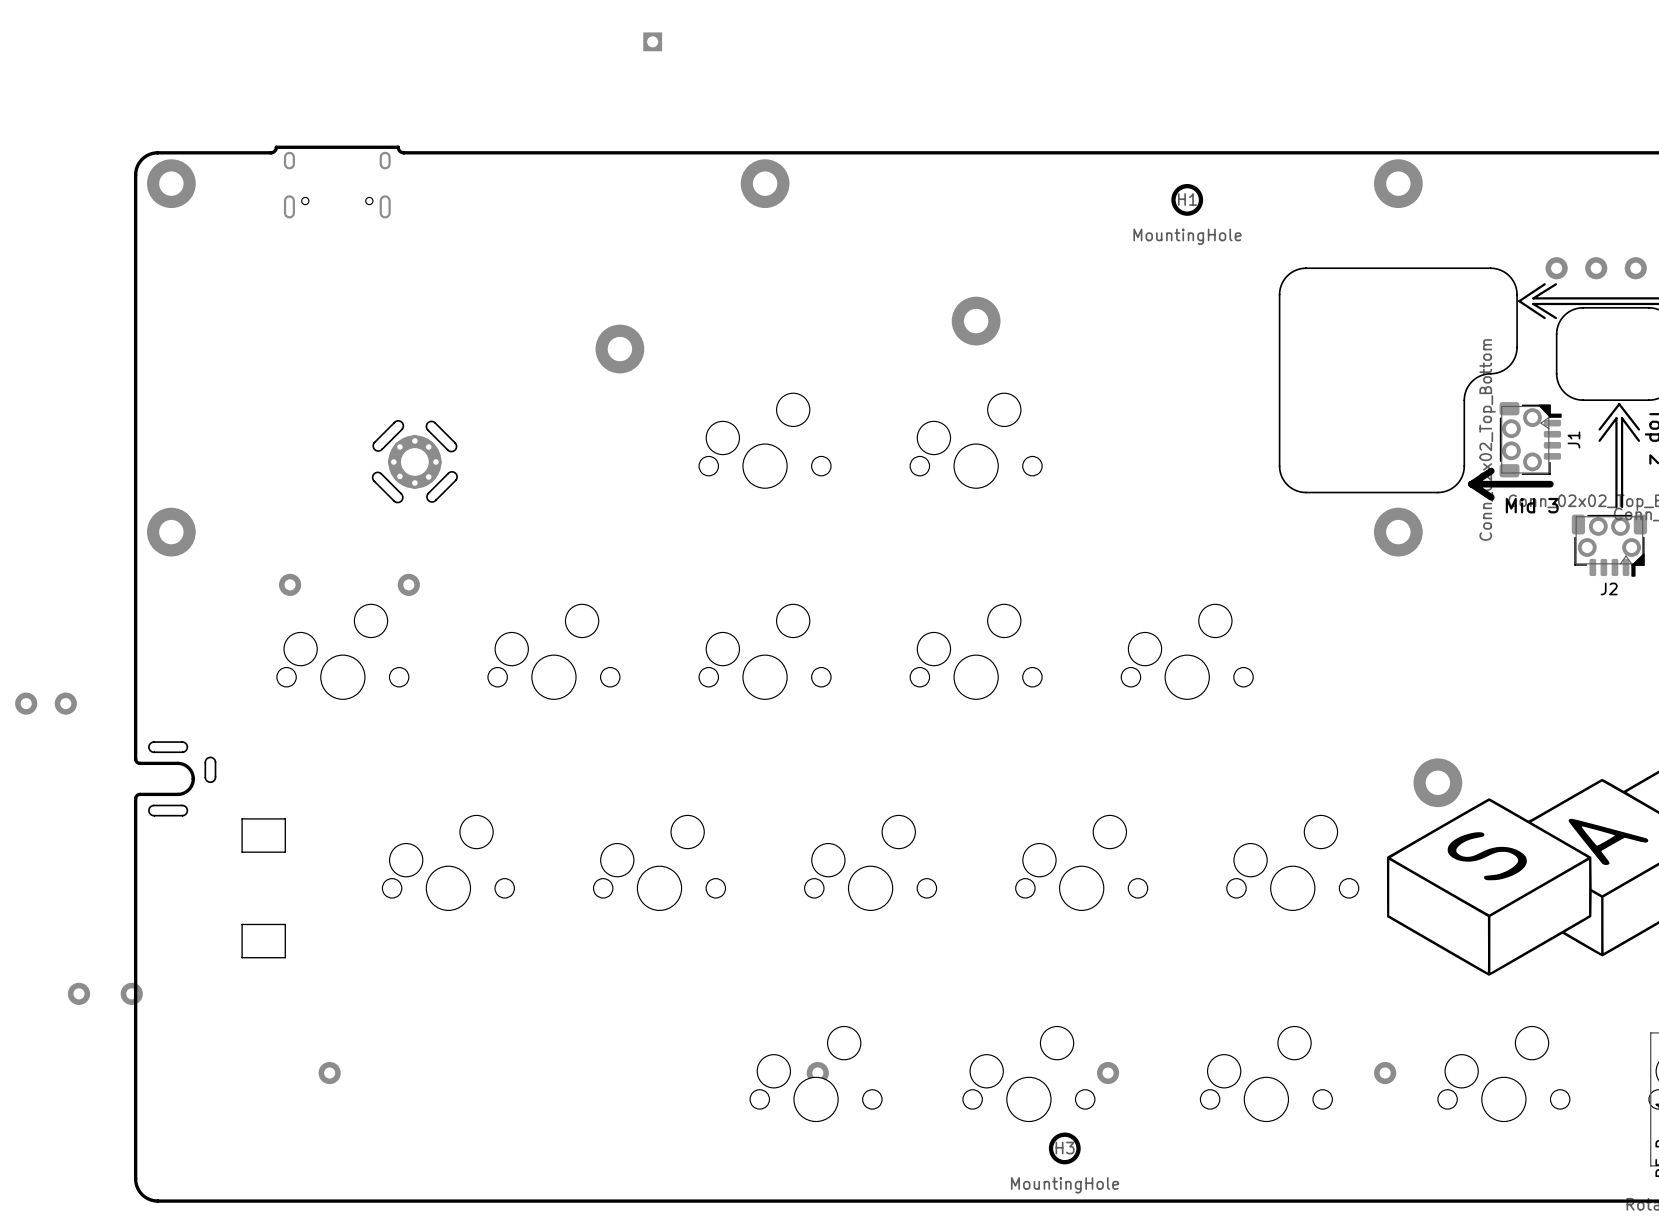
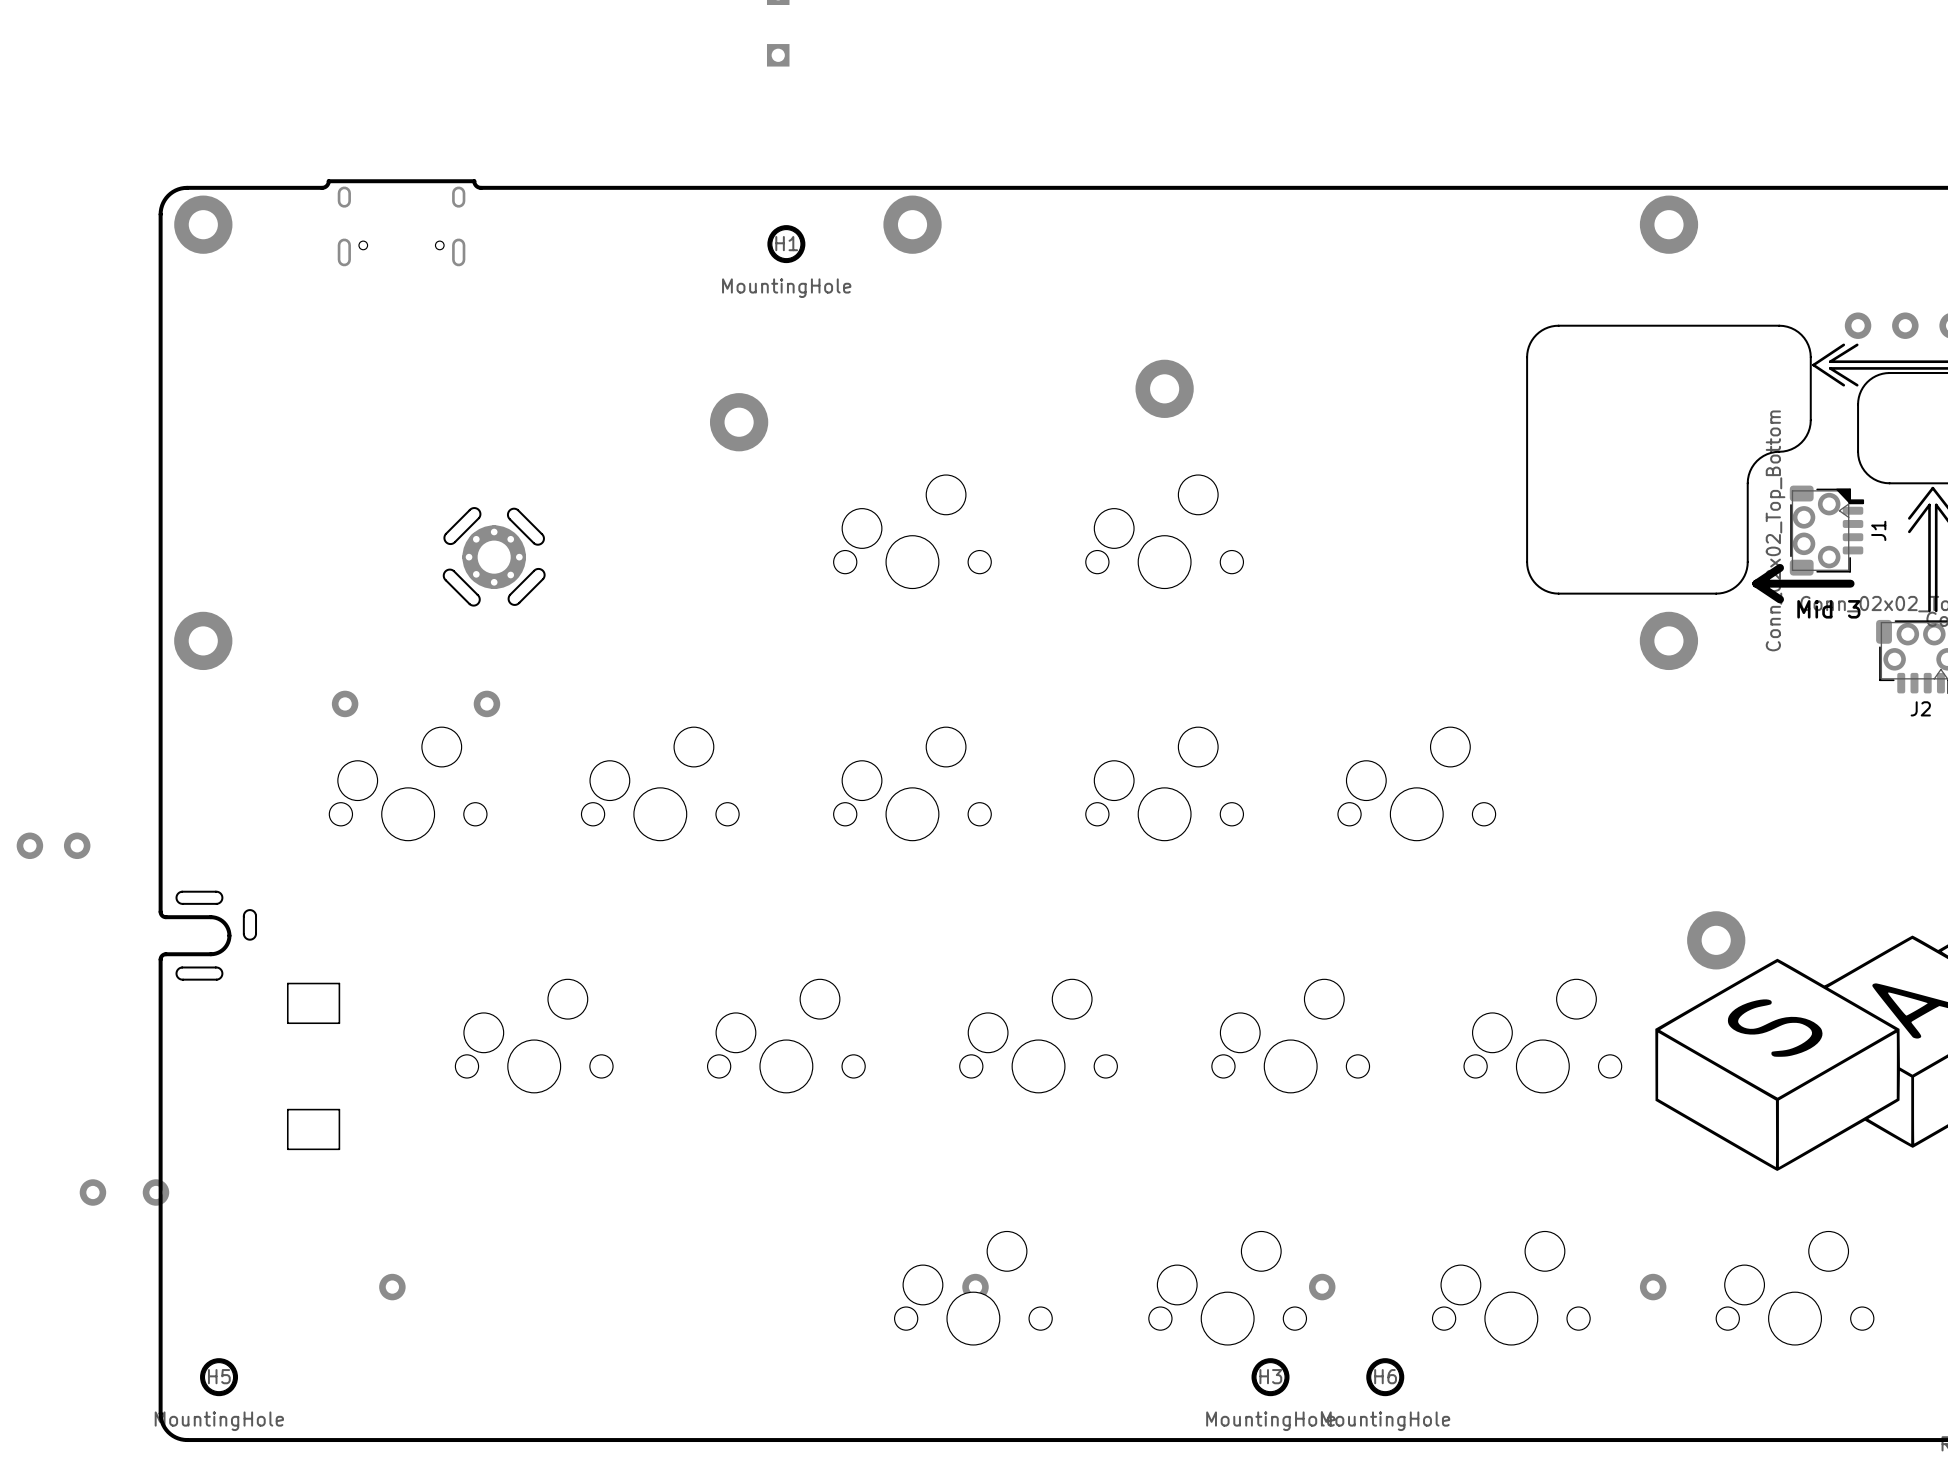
H1 position: (1187, 199) -> (786, 244)
H5: none -> MountingHole (219, 1377)
H6: none -> MountingHole (1385, 1377)

